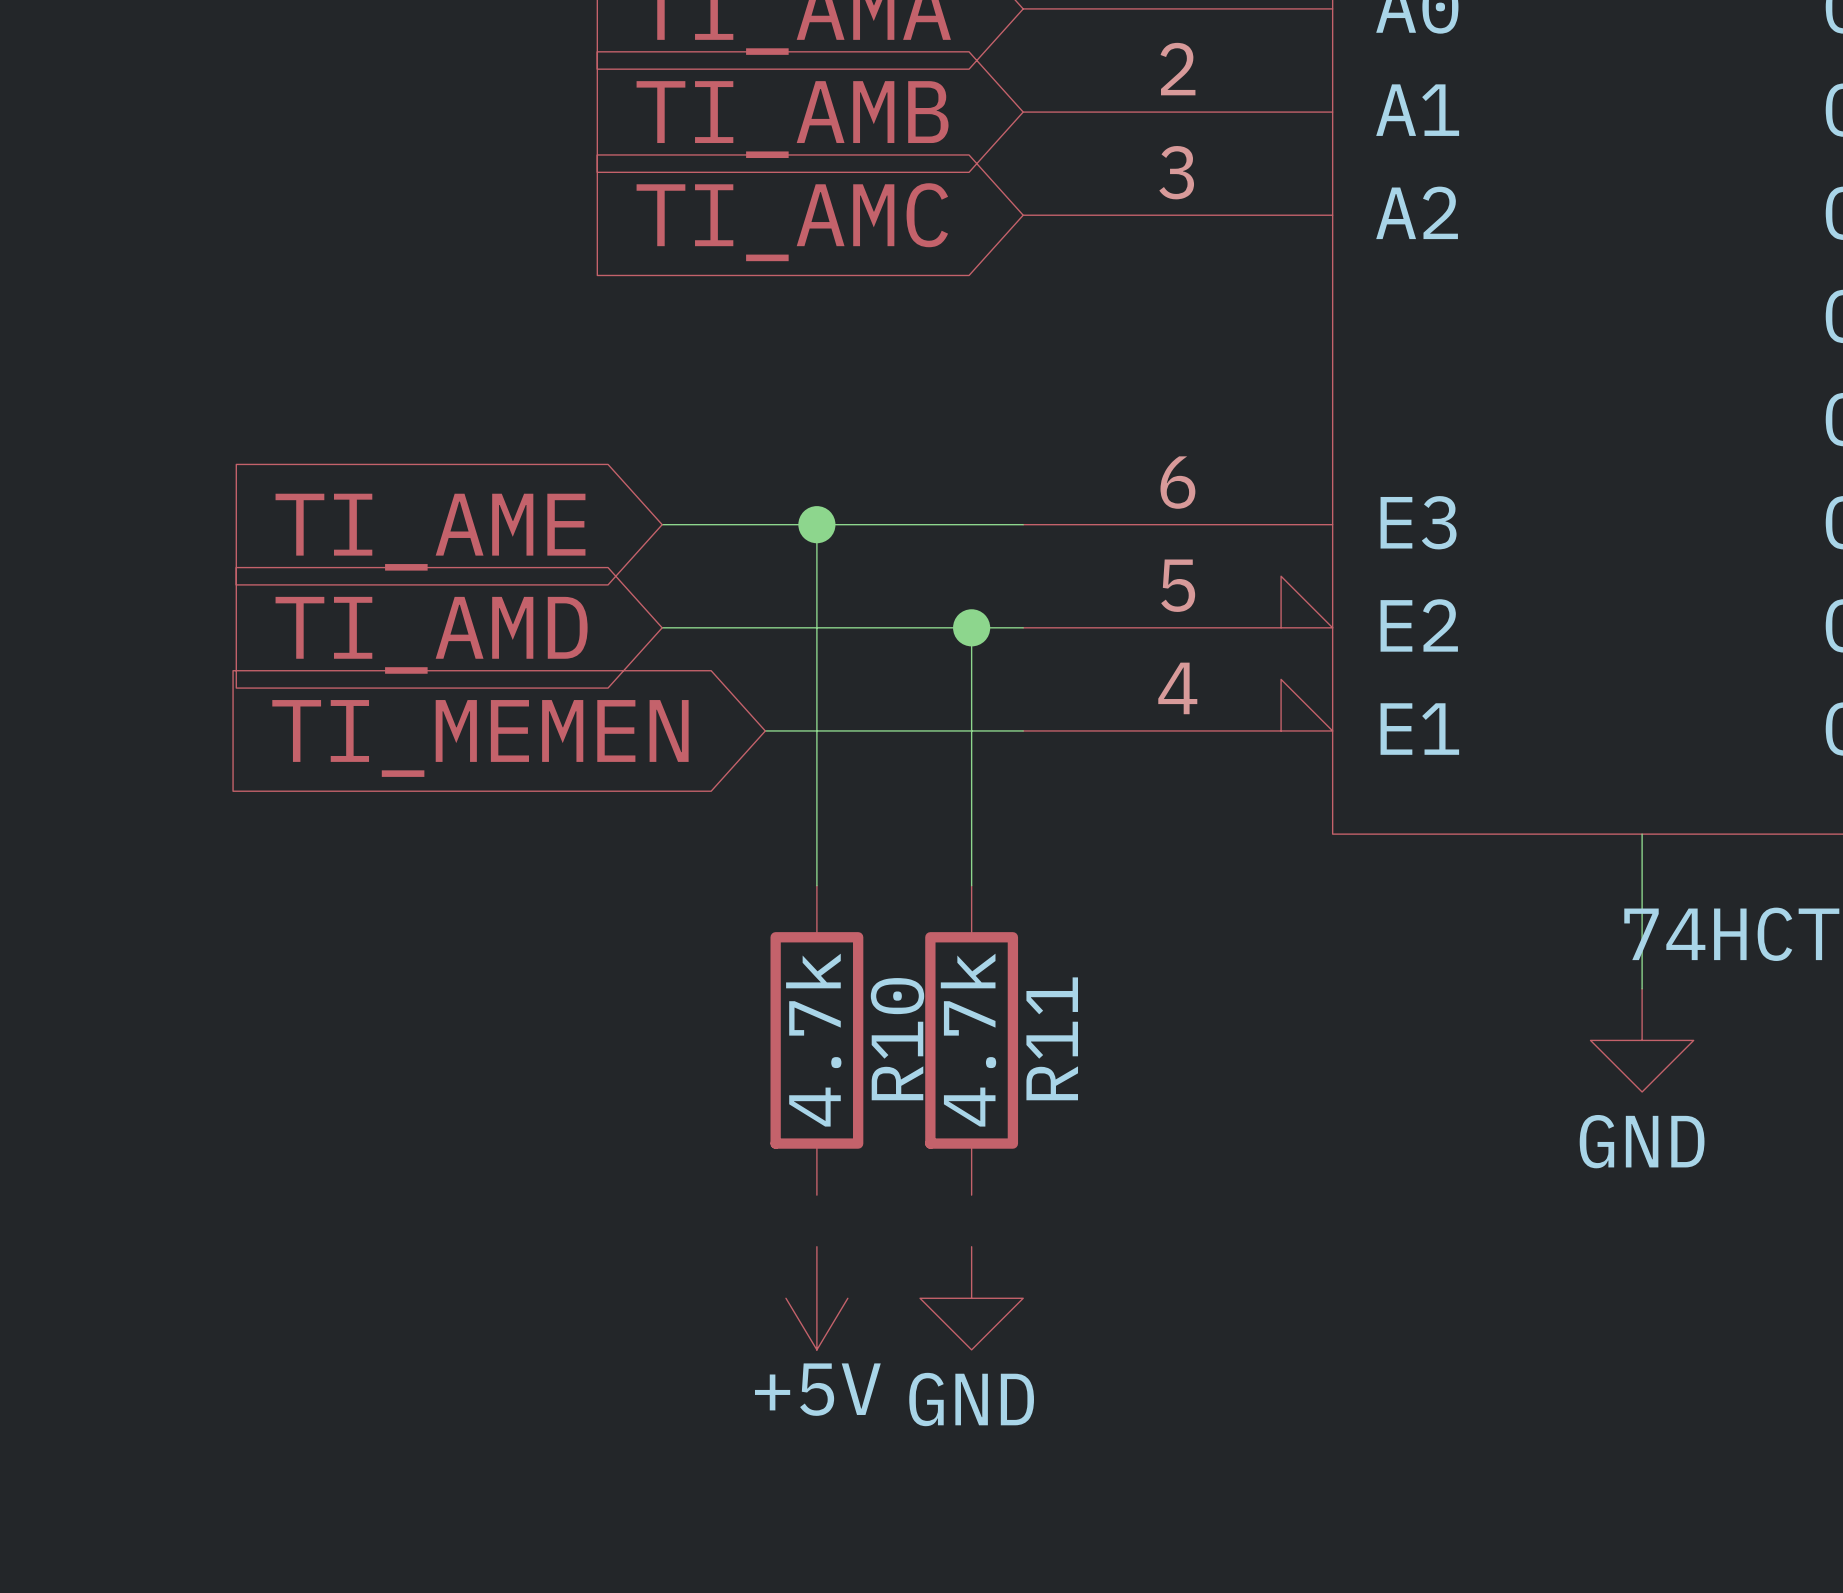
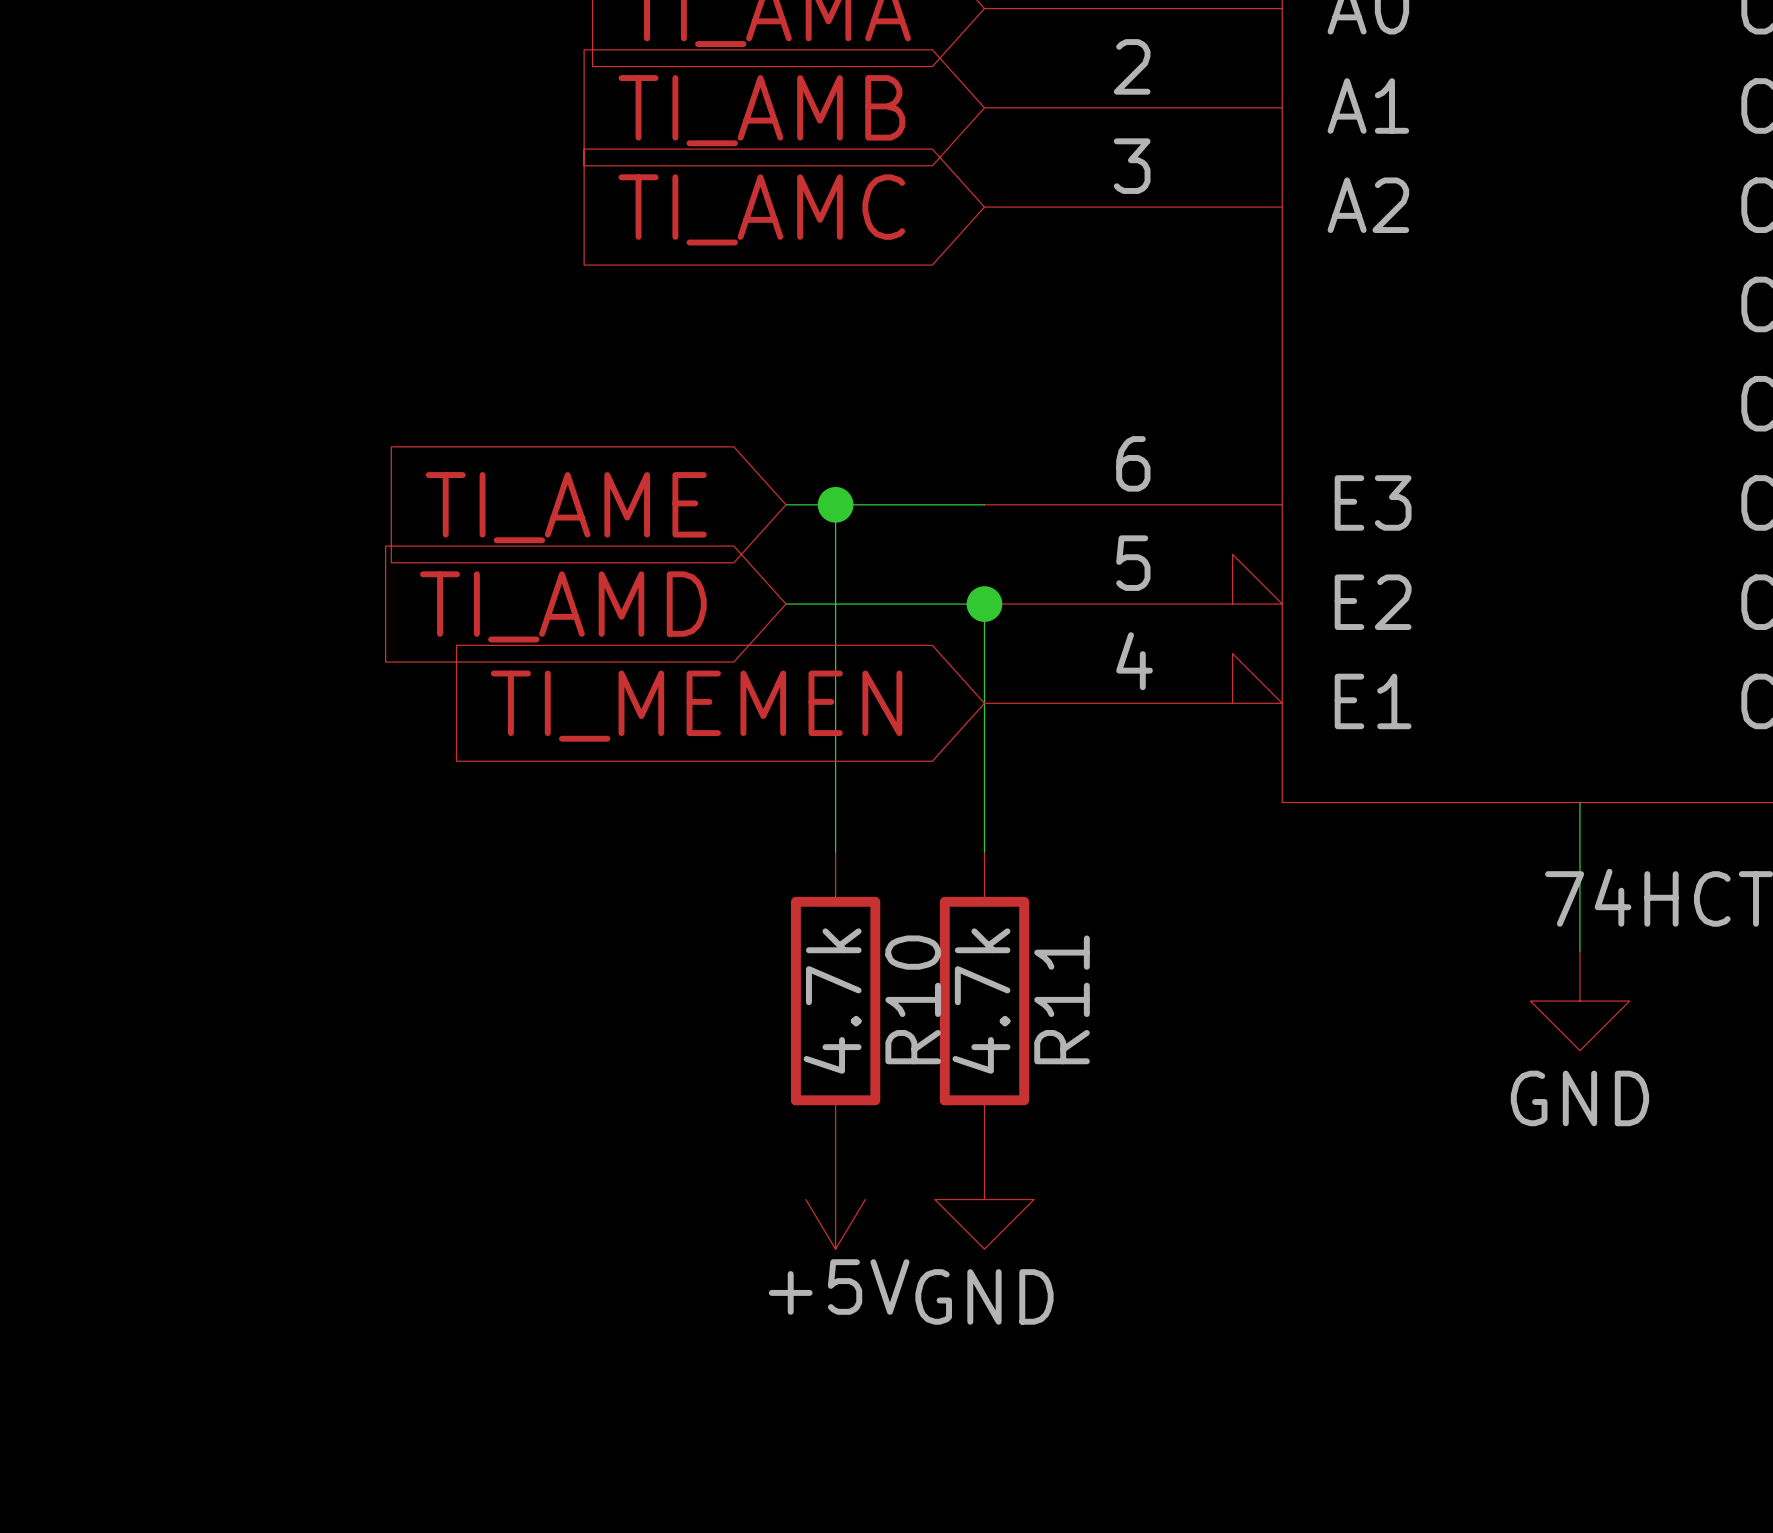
wire: (662, 524) (816, 524) (816, 885) -> none
junction position: (816, 524) -> (835, 504)
wire: none -> (835, 504) (835, 852)
global label position: TI_AME (430, 532) -> TI_AME (566, 507)
wire: (662, 627) (816, 627) -> none
wire: (971, 627) (971, 885) -> (984, 604) (984, 852)
junction position: (971, 627) -> (984, 604)
global label position: TI_AMD (431, 635) -> TI_AMD (563, 606)
wire: (765, 730) (1023, 730) -> none
global label position: TI_MEMEN (480, 738) -> TI_MEMEN (696, 706)
R10 position: (816, 1040) -> (835, 1001)
R11 position: (971, 1040) -> (984, 1001)
power symbol position: +5V (816, 1298) -> +5V (835, 1199)
power symbol position: GND (971, 1298) -> GND (984, 1199)

